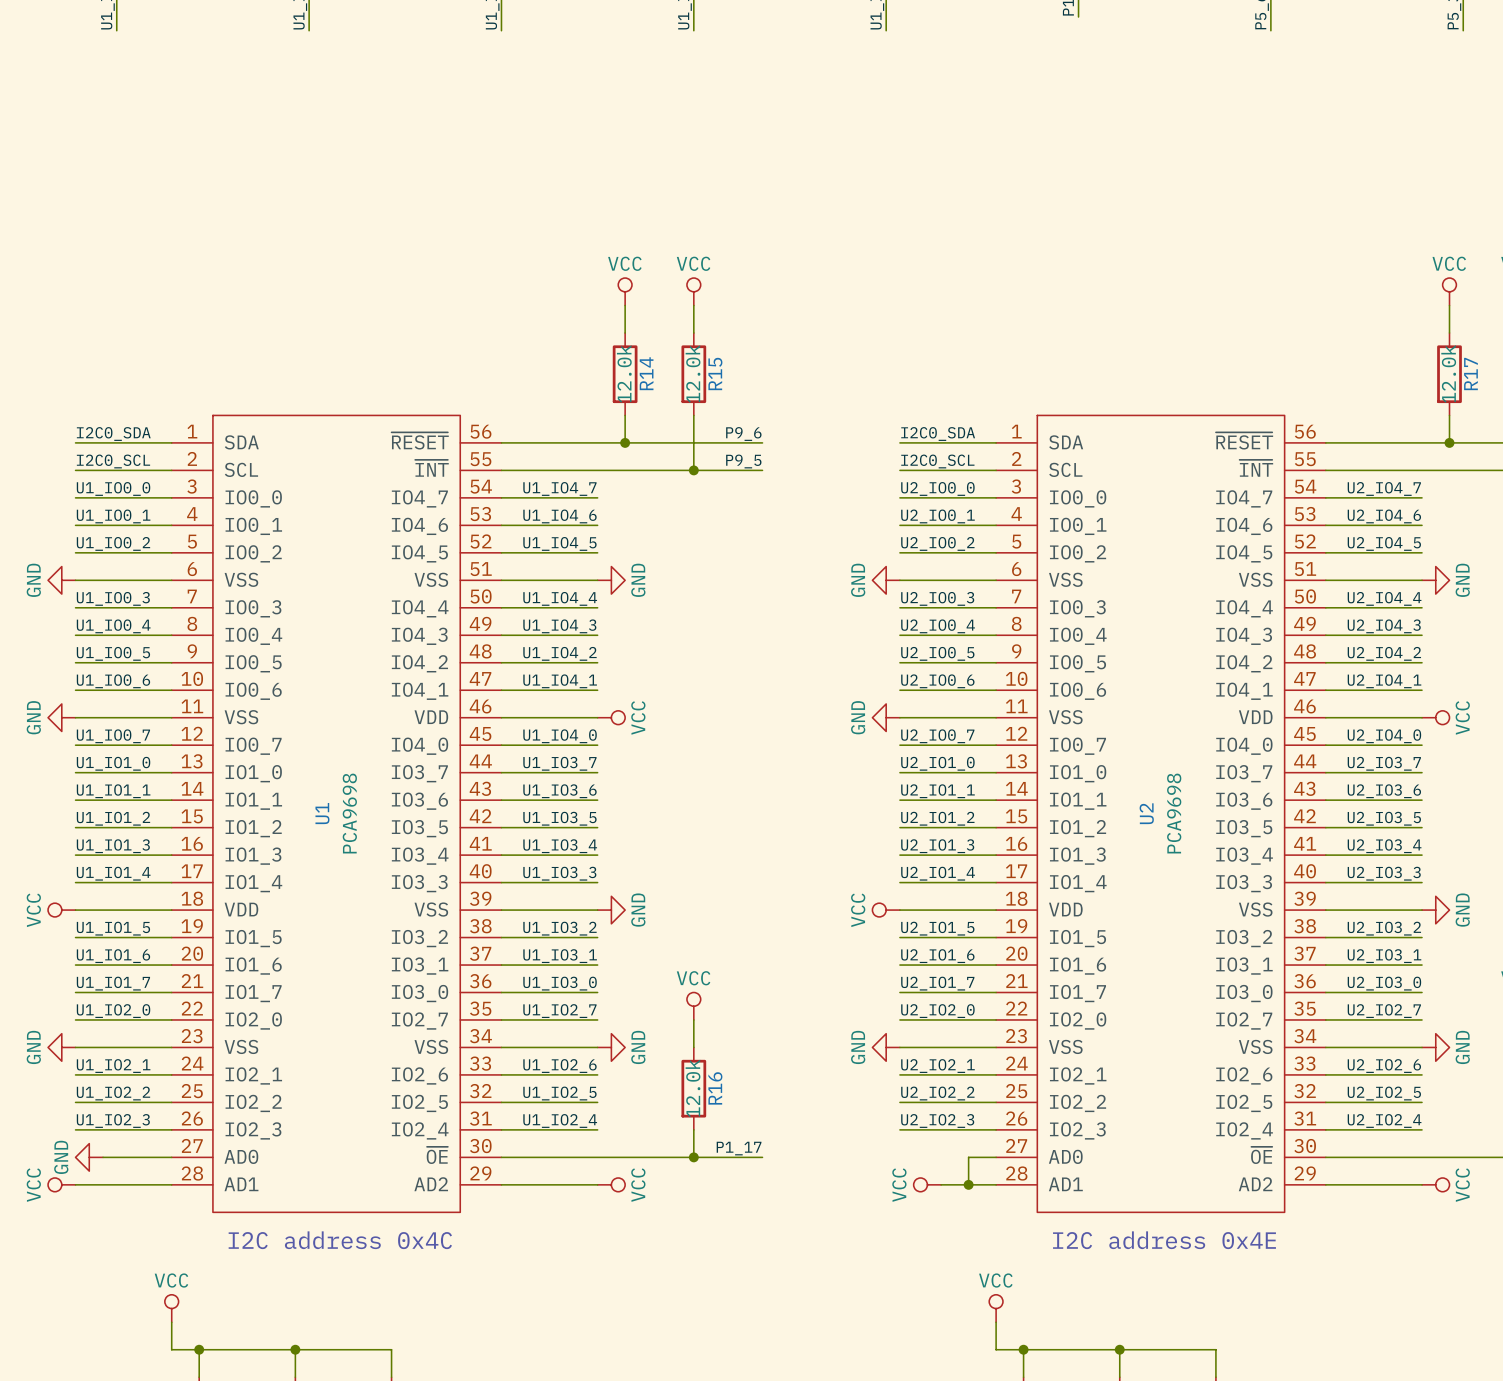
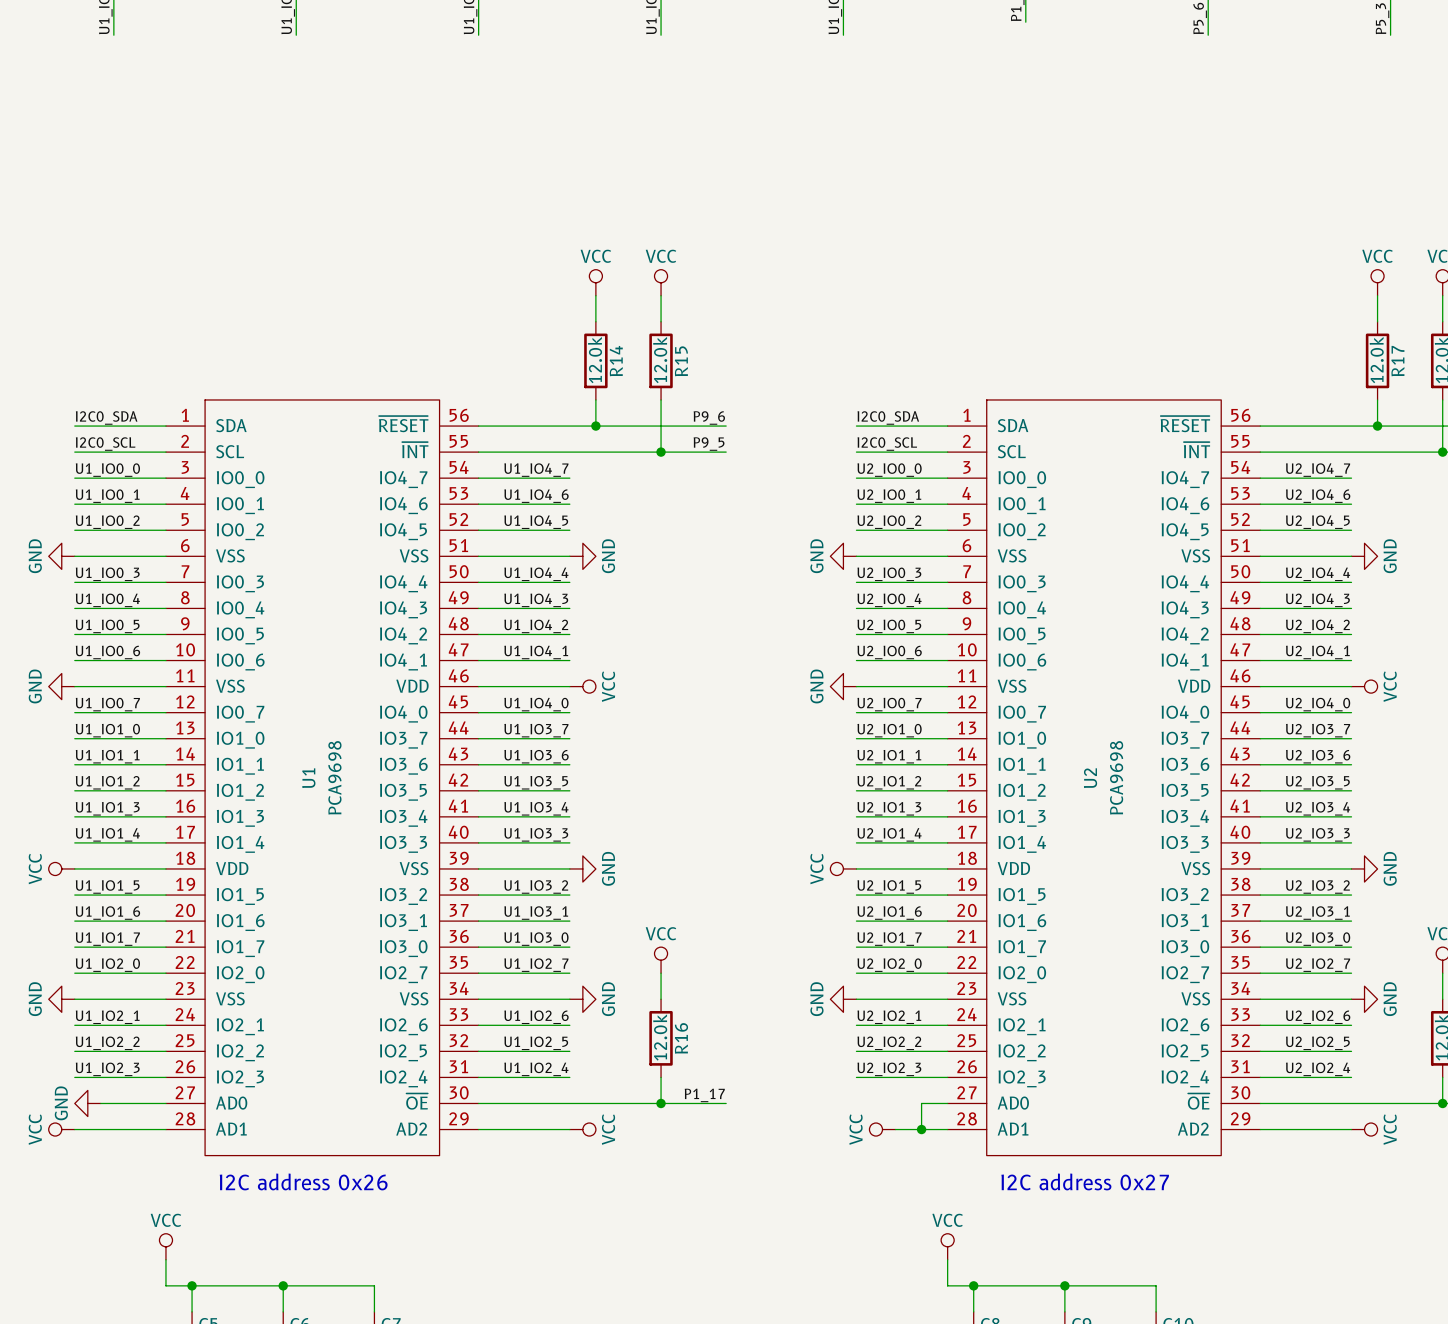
text: I2C address 0x4C (340, 1240) -> I2C address 0x26 (303, 1181)
text: I2C address 0x4E (1164, 1240) -> I2C address 0x27 (1085, 1181)

